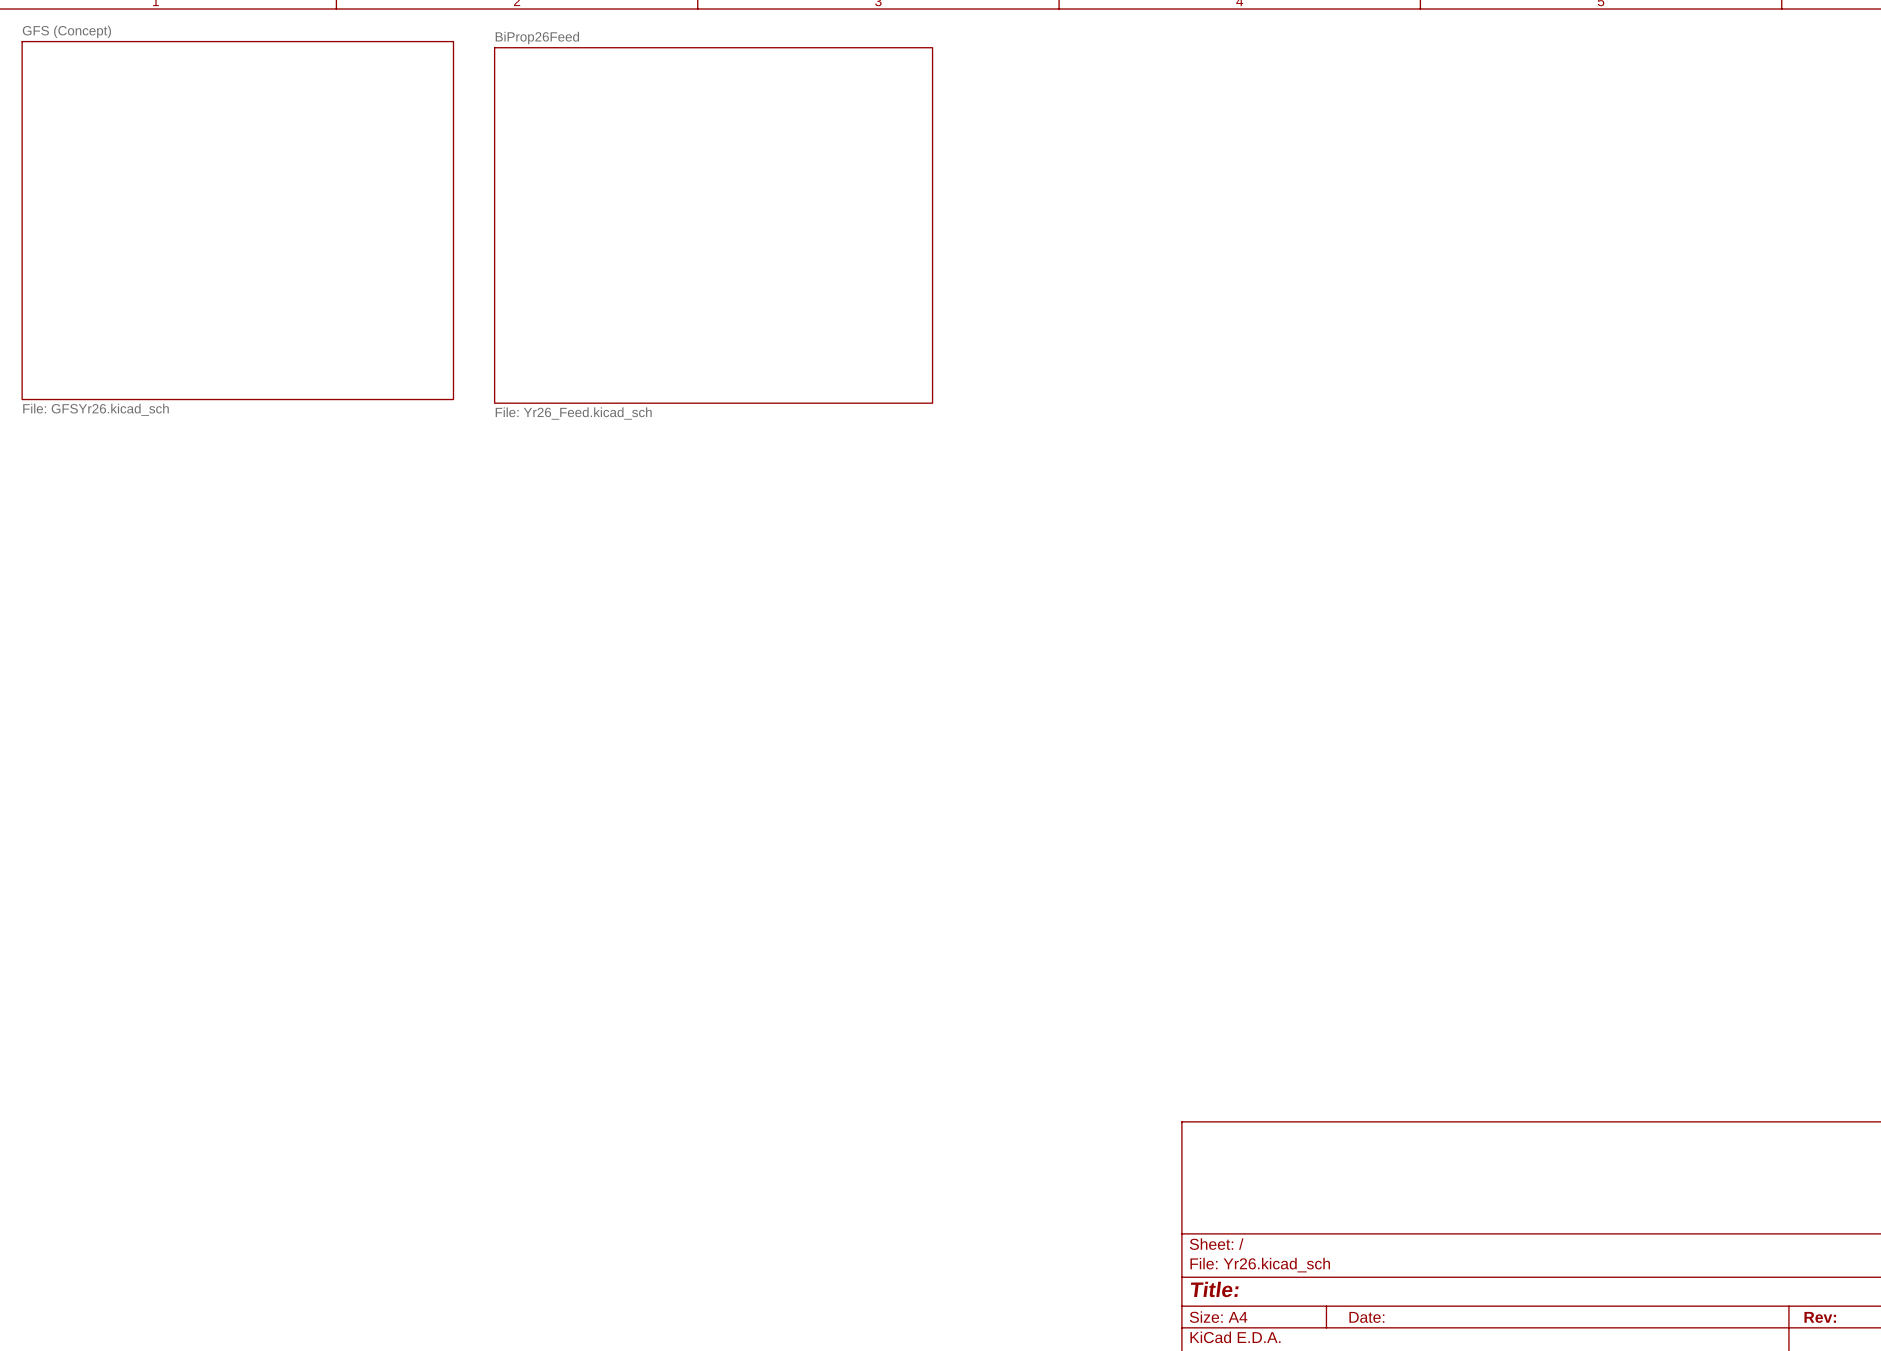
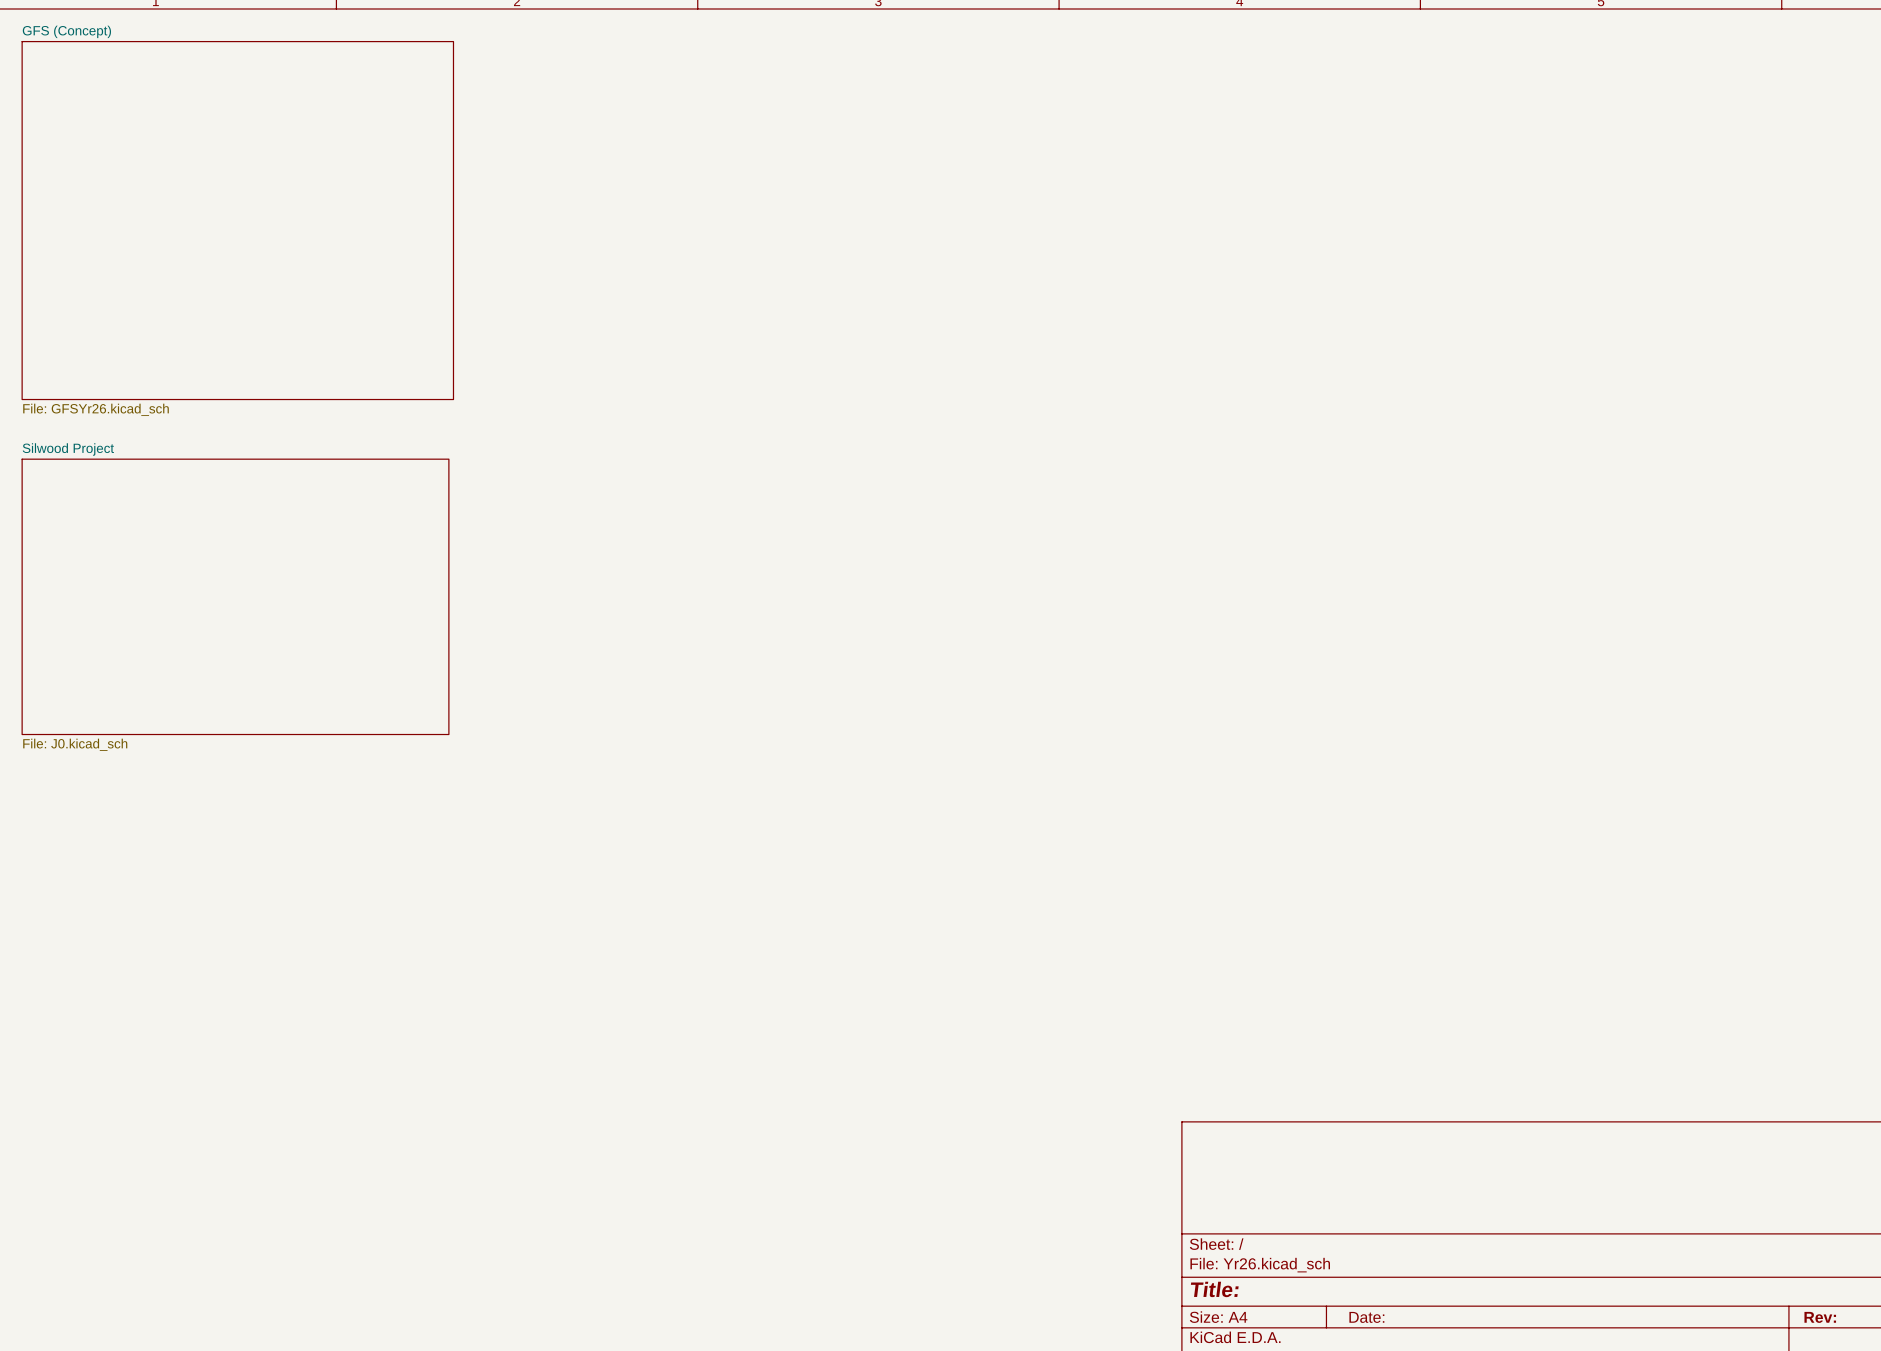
sheet BiProp26Feed: File: Yr26_Feed.kicad_sch (713, 225) -> none
sheet Silwood Project: none -> File: J0.kicad_sch (235, 596)

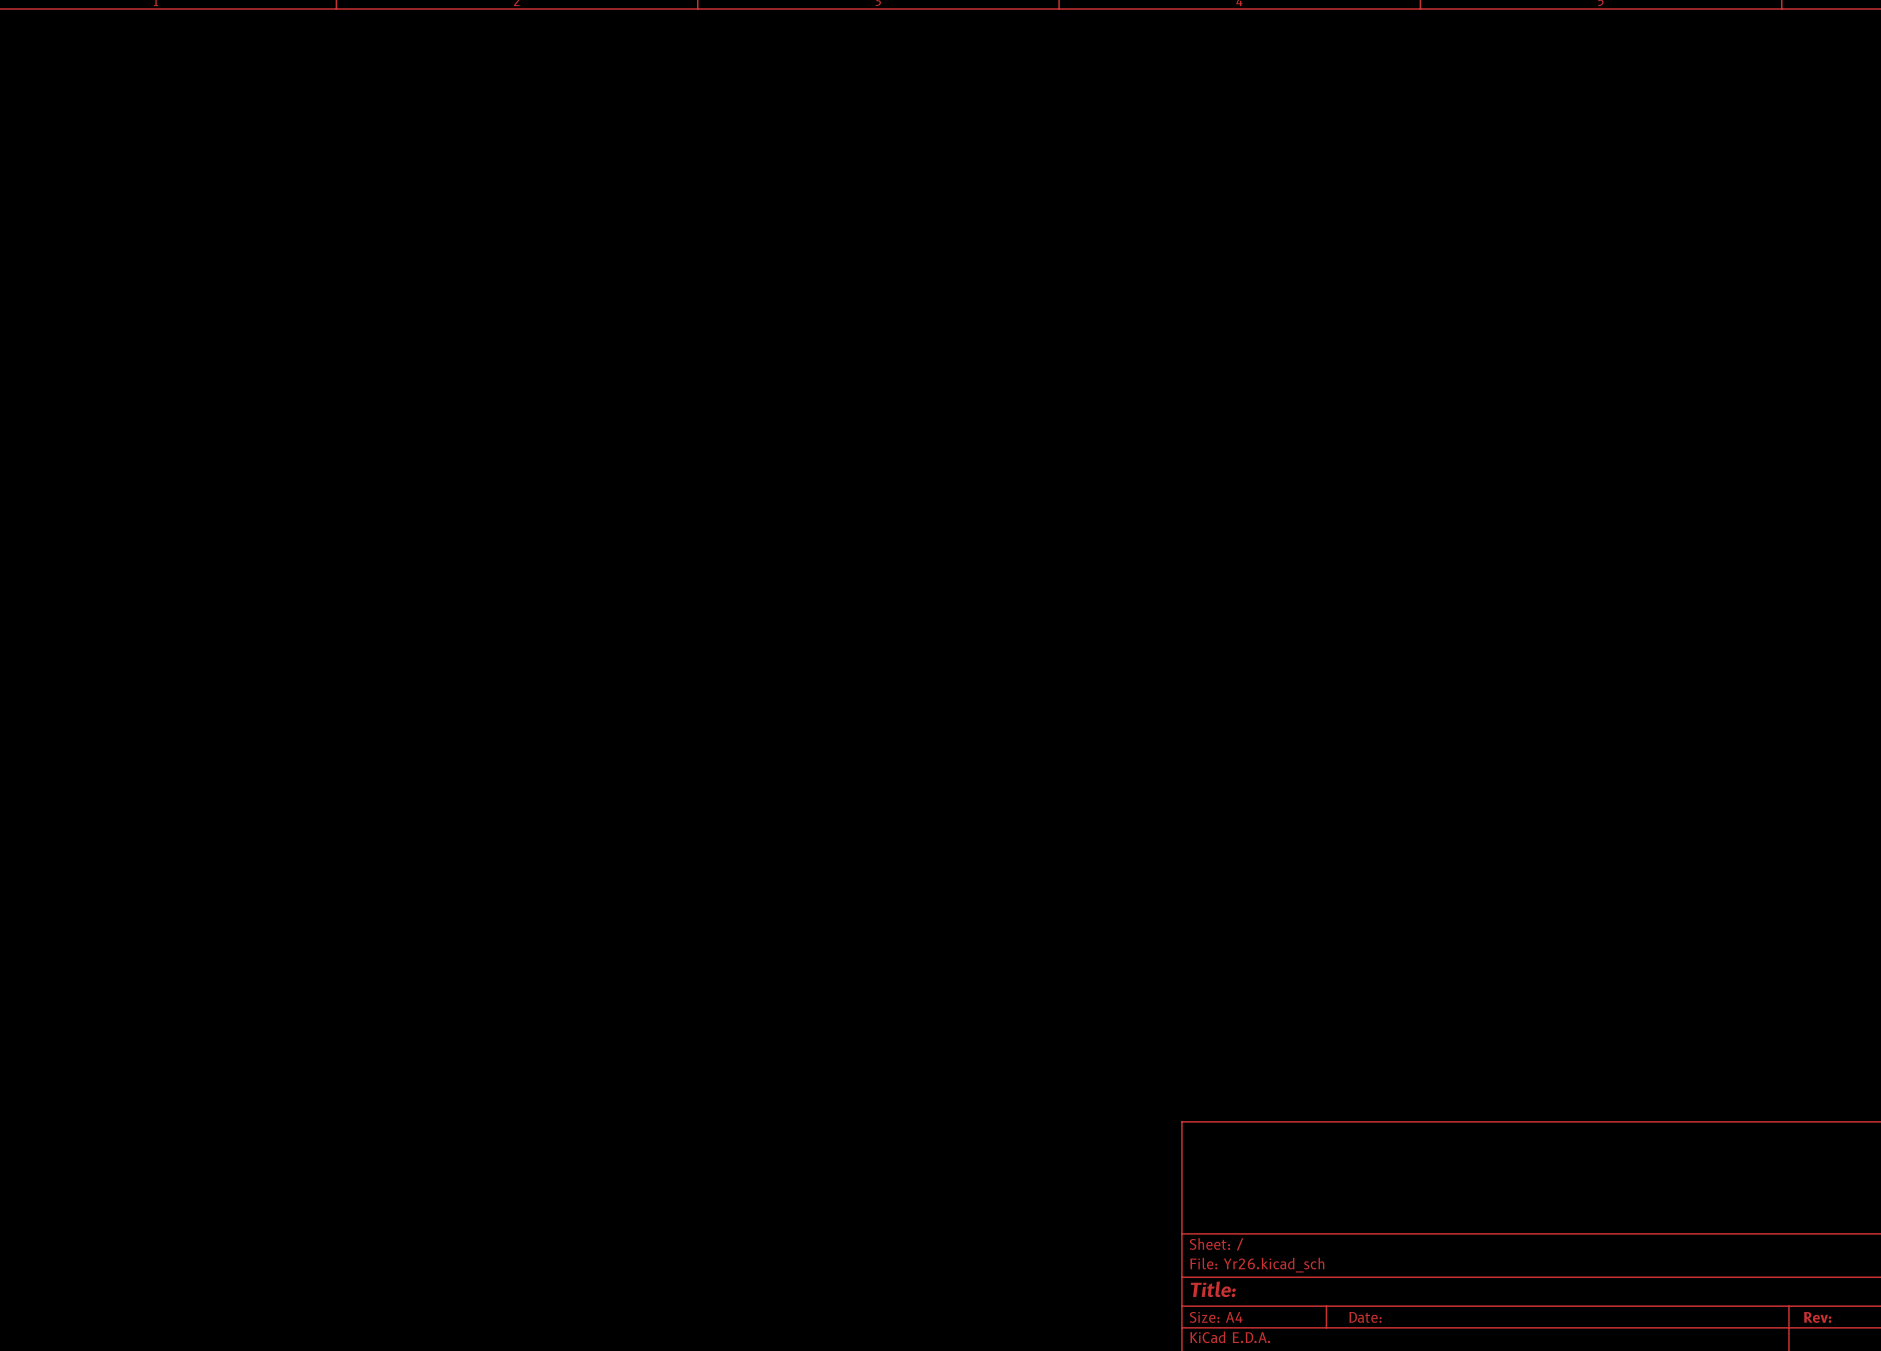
sheet GFS (Concept): File: GFSYr26.kicad_sch (237, 220) -> none
sheet Silwood Project: File: J0.kicad_sch (235, 596) -> none

